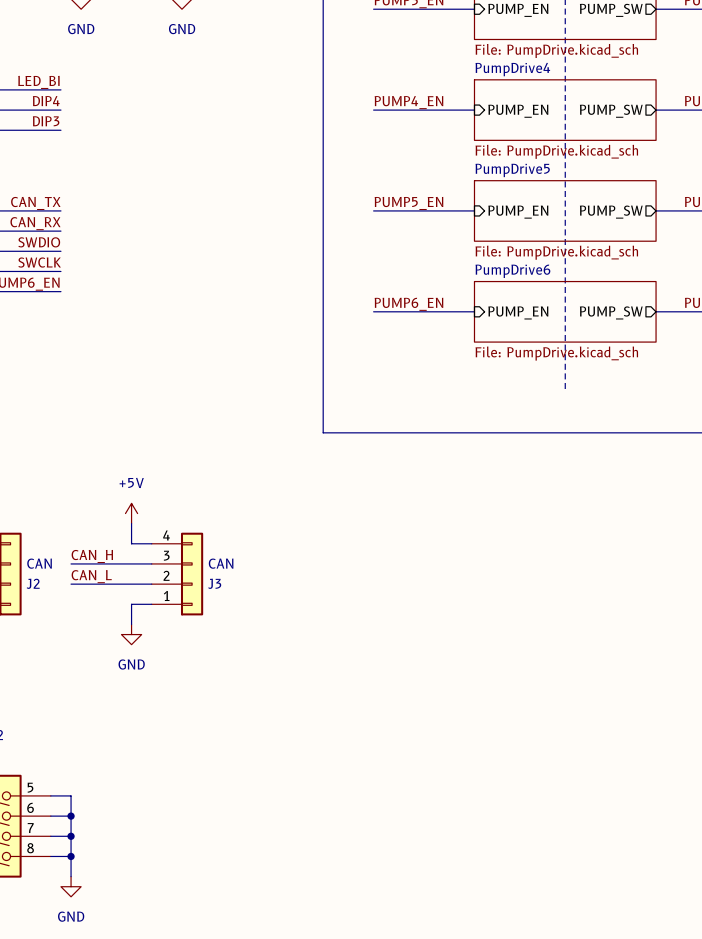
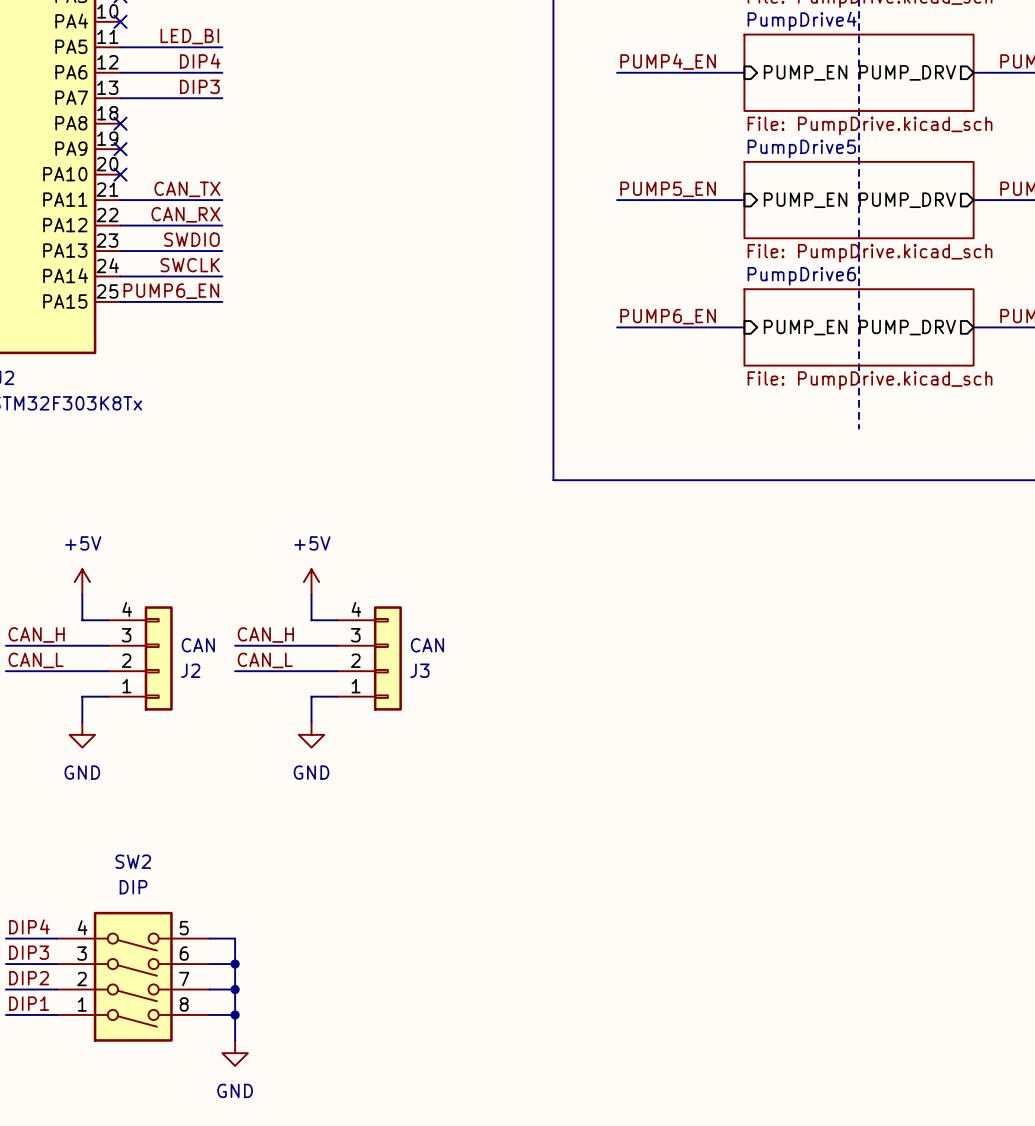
sheet pin: PUMP_SW (611, 111) -> PUMP_DRV (907, 72)
sheet pin: PUMP_SW (611, 212) -> PUMP_DRV (907, 200)
sheet pin: PUMP_SW (611, 312) -> PUMP_DRV (907, 327)

